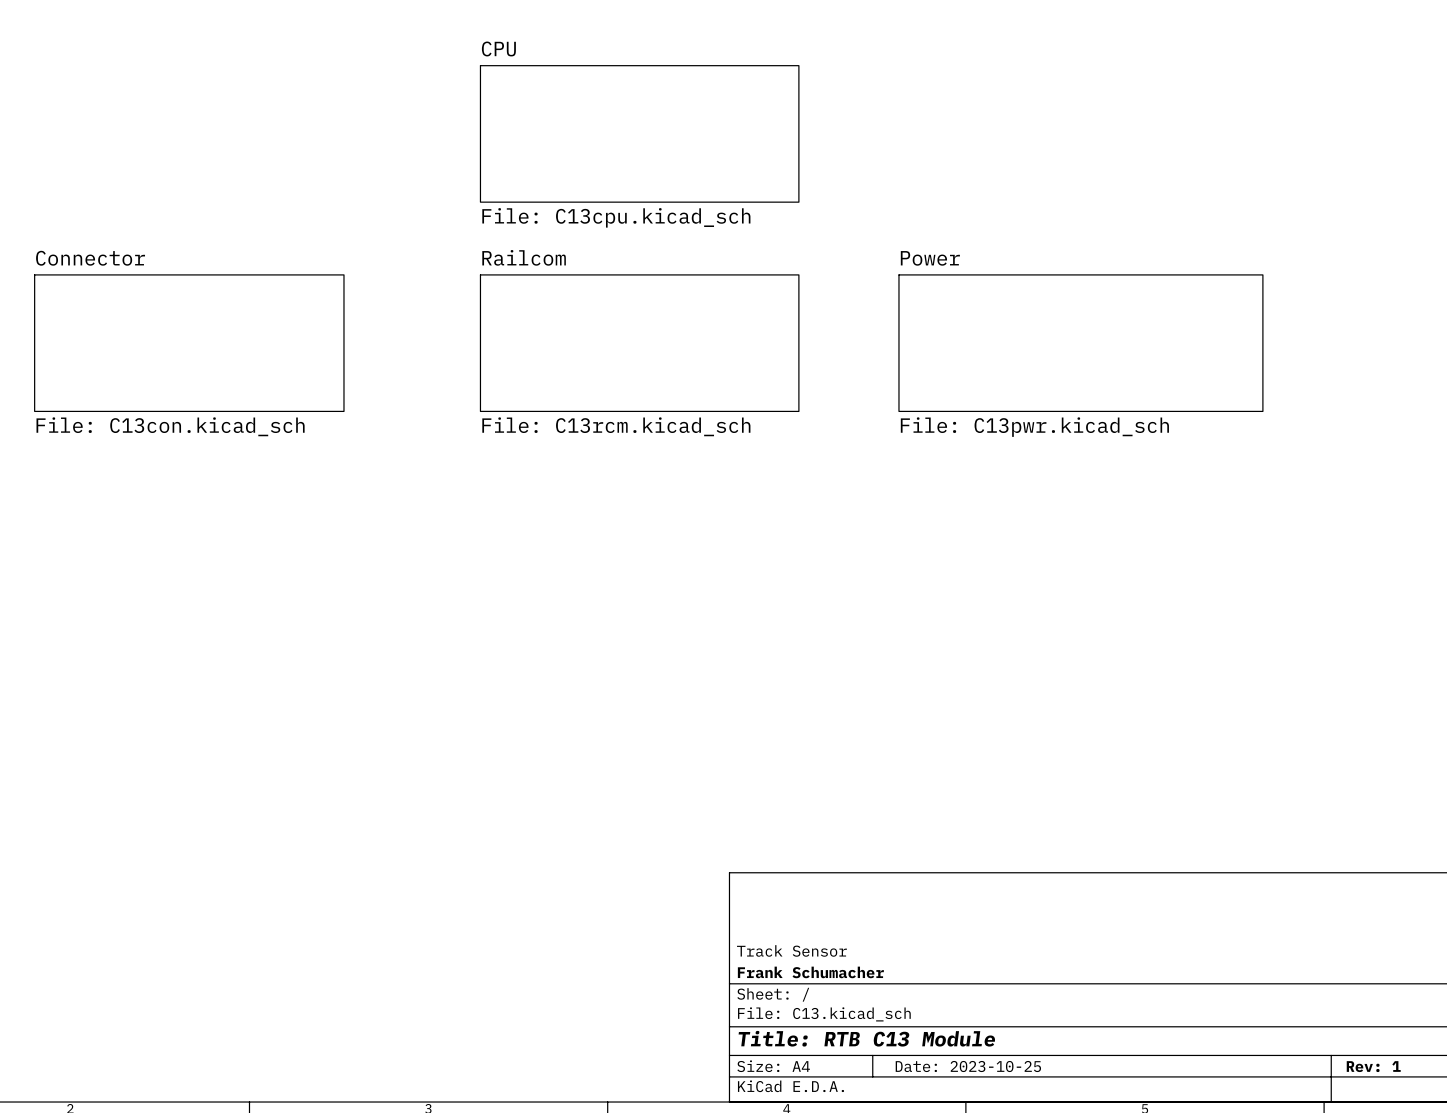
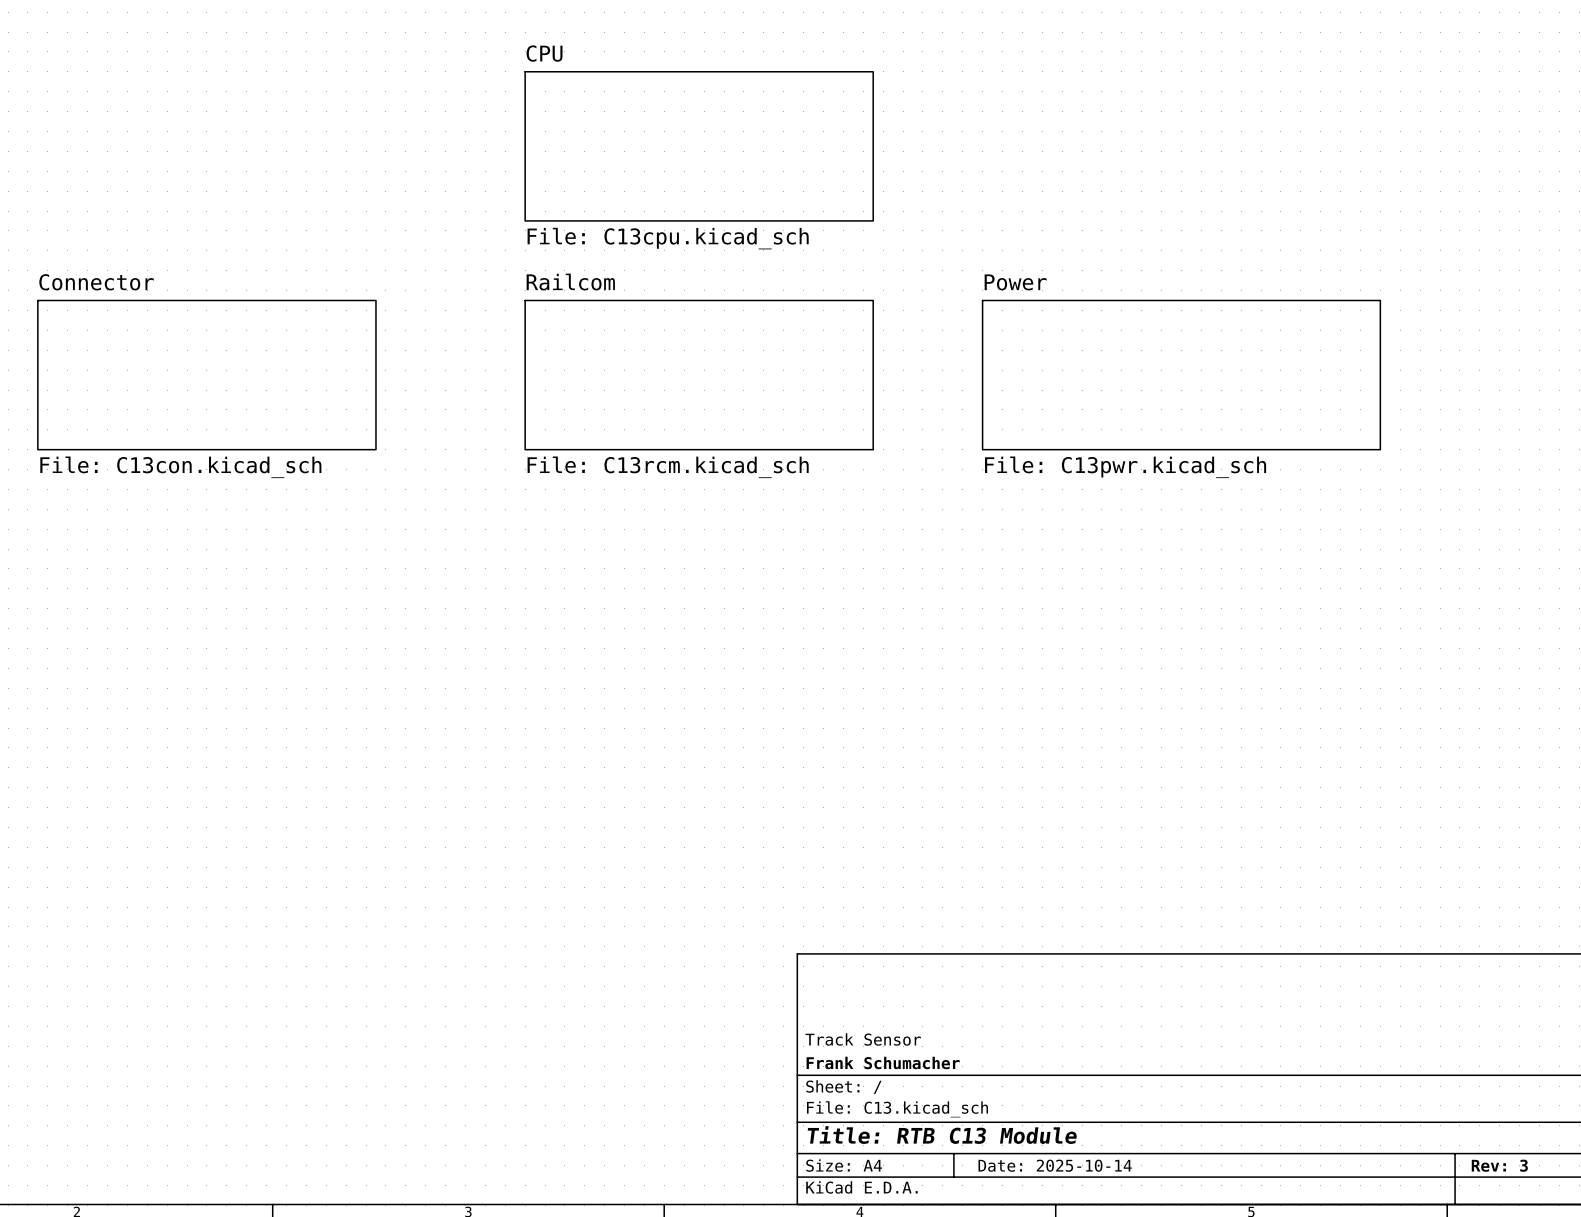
title block: Date: 2023-10-25 (968, 1066) -> Date: 2025-10-14 (1055, 1165)
title block: Rev: 1 (1373, 1066) -> Rev: 3 (1499, 1165)

